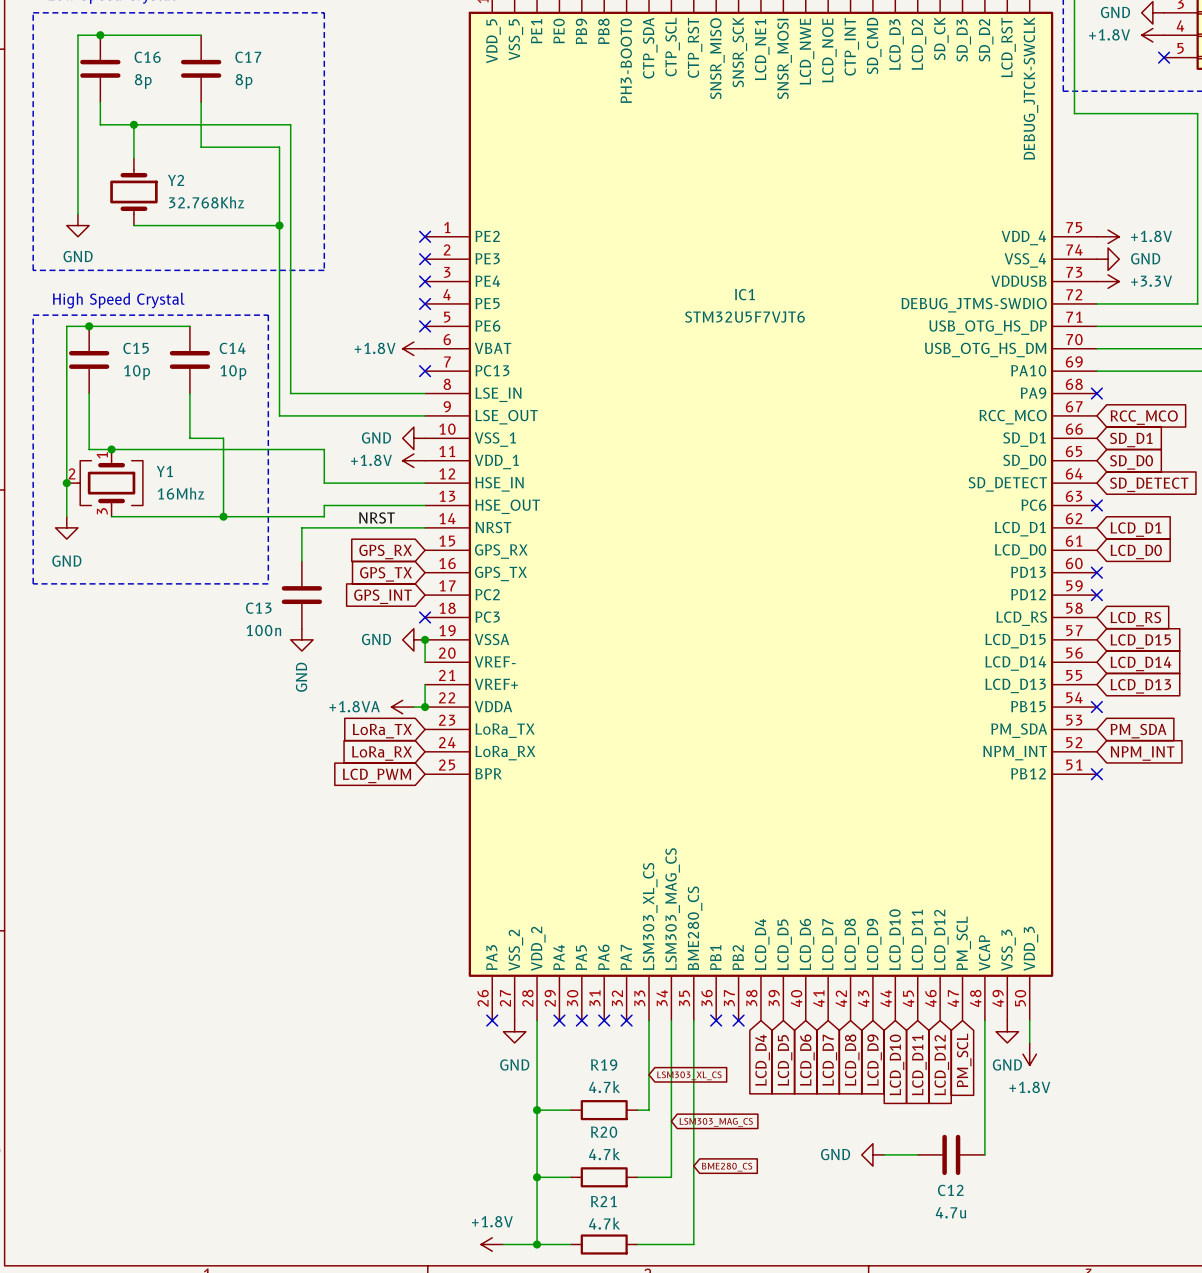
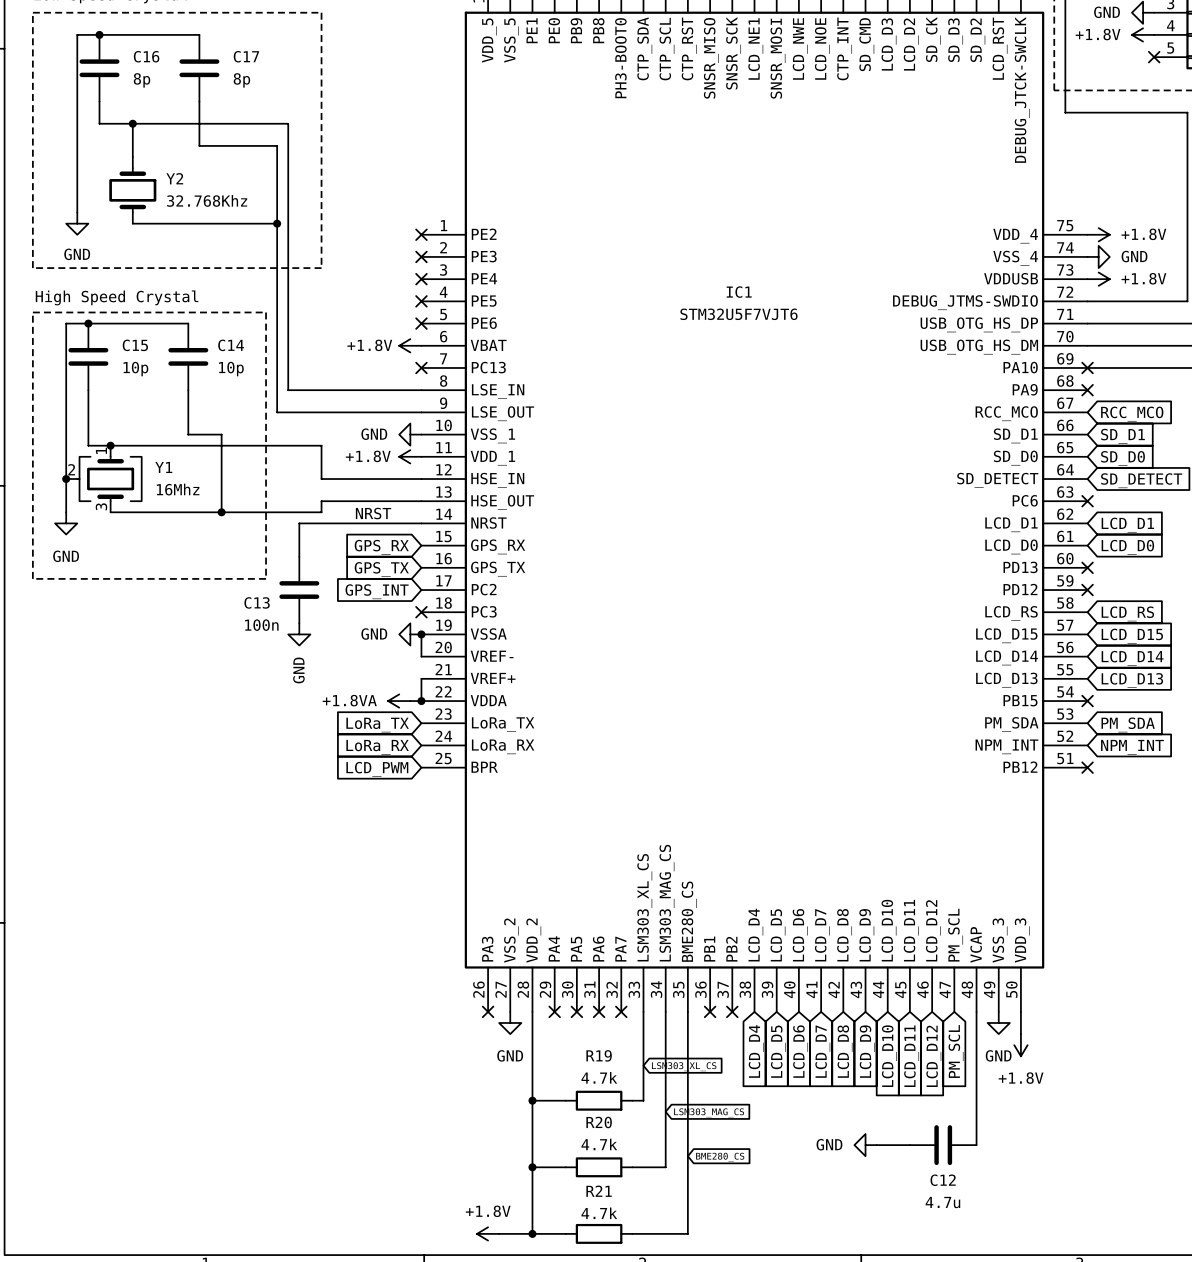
power symbol: +3.3V (1108, 281) -> +1.8V (1098, 279)
no-connect mark: none -> (1087, 367)

